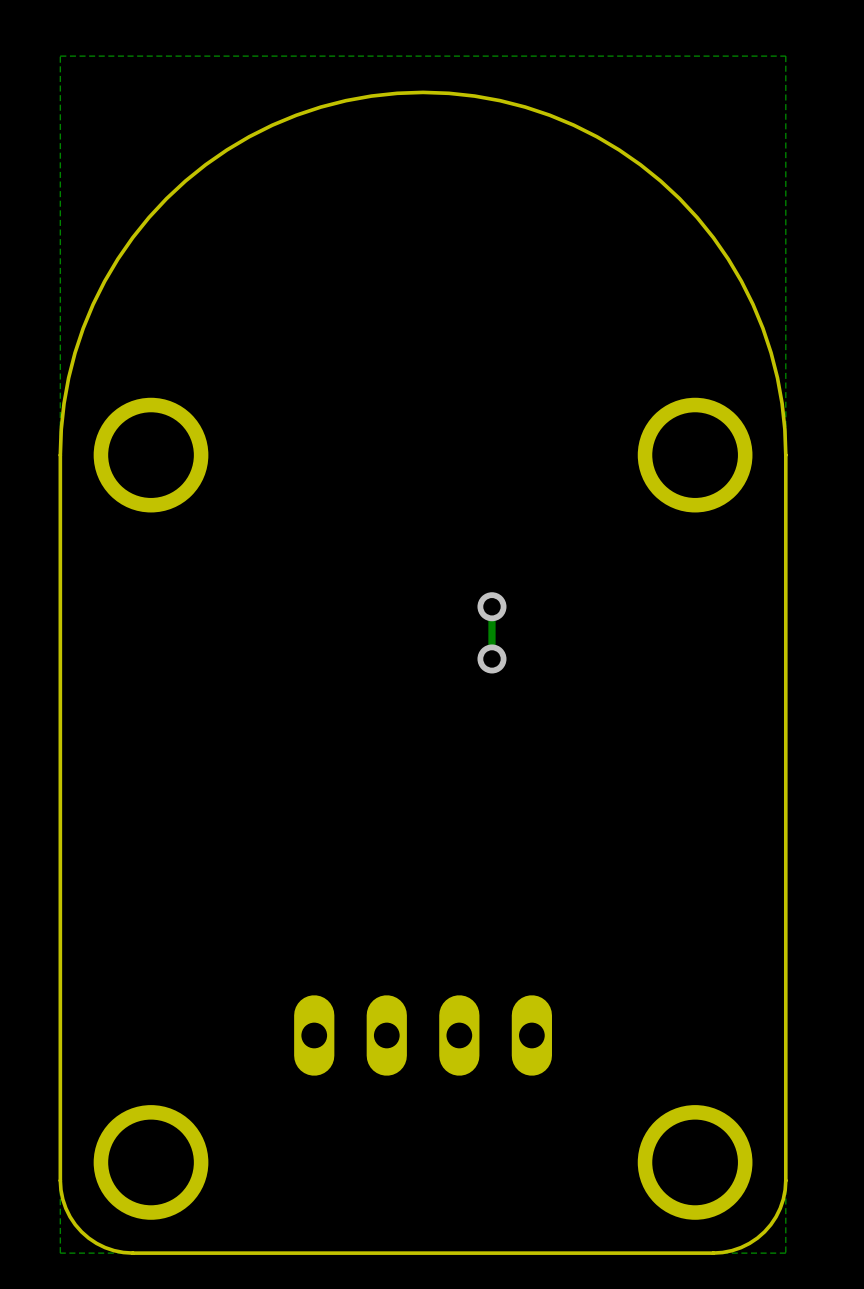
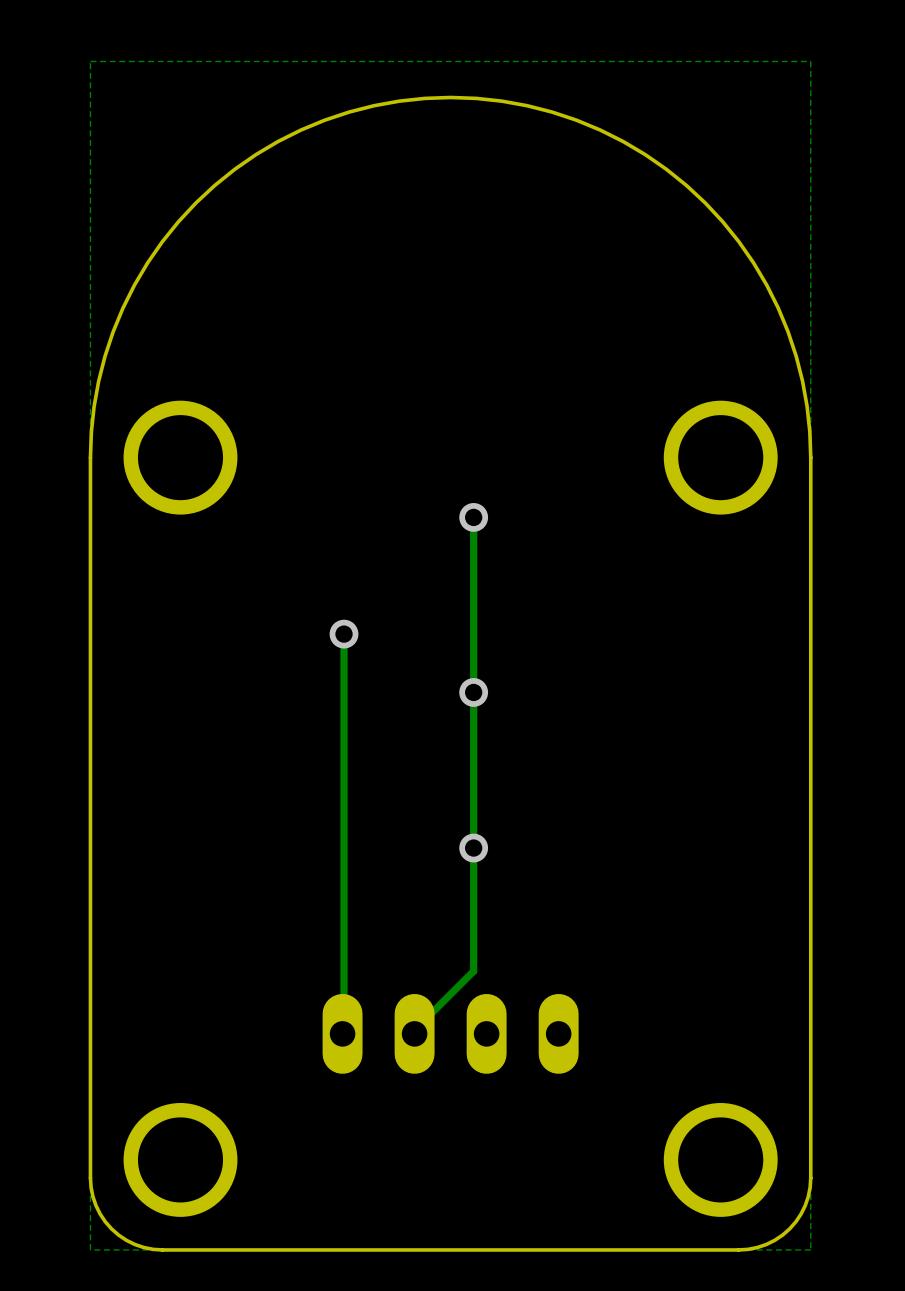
track: none -> (473, 517) (473, 971) (415, 1029) (414, 1033)
via: none -> (473, 517)
track: (491, 606) (491, 658) -> none
via: (491, 606) -> none
track: none -> (344, 634) (342, 1033)
via: none -> (344, 634)
via: (491, 658) -> none
via: none -> (473, 692)
via: none -> (473, 848)

